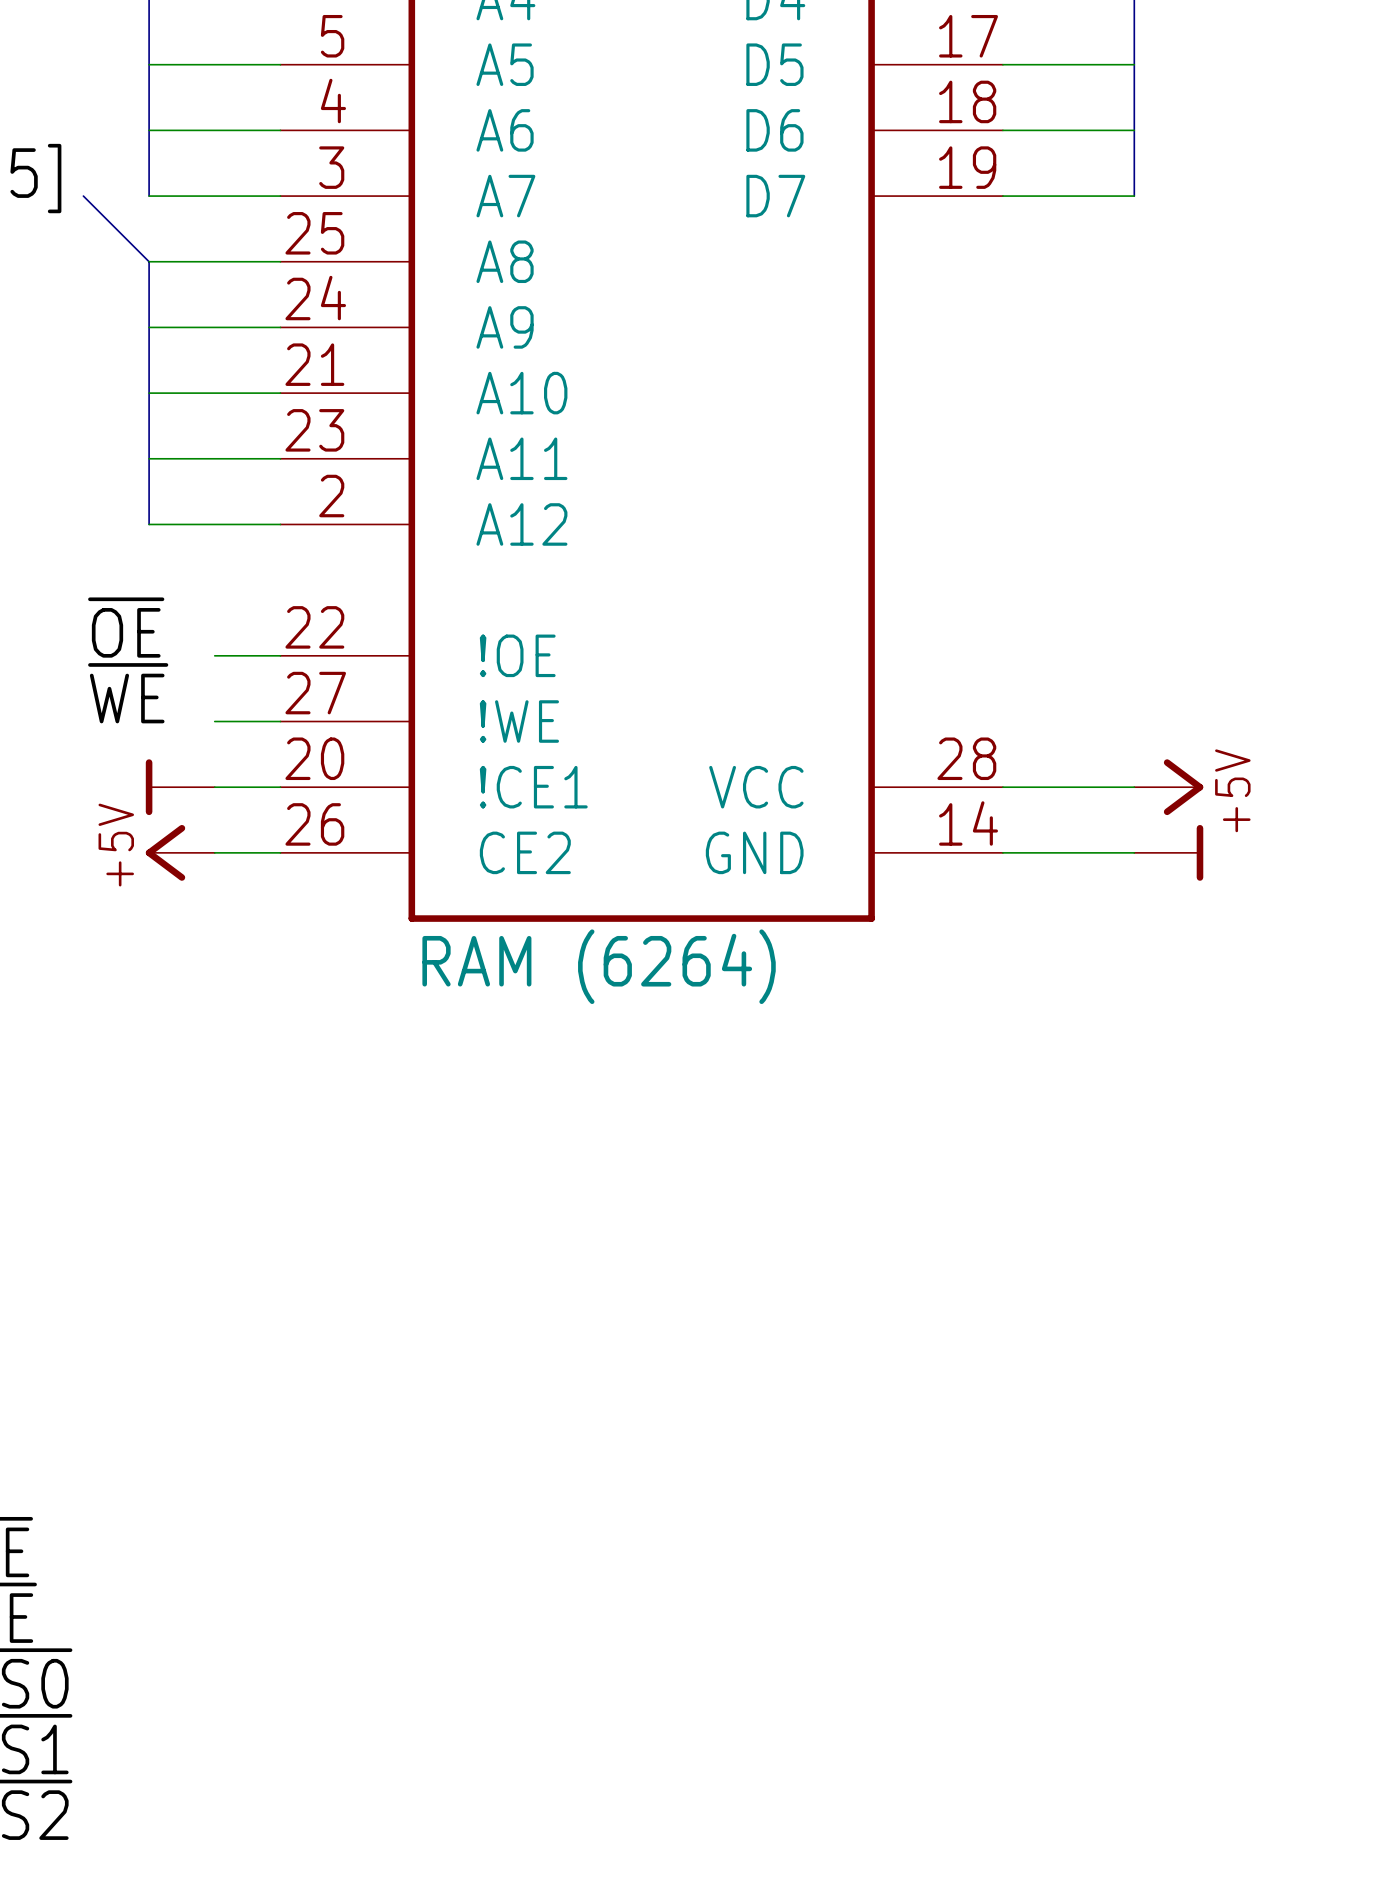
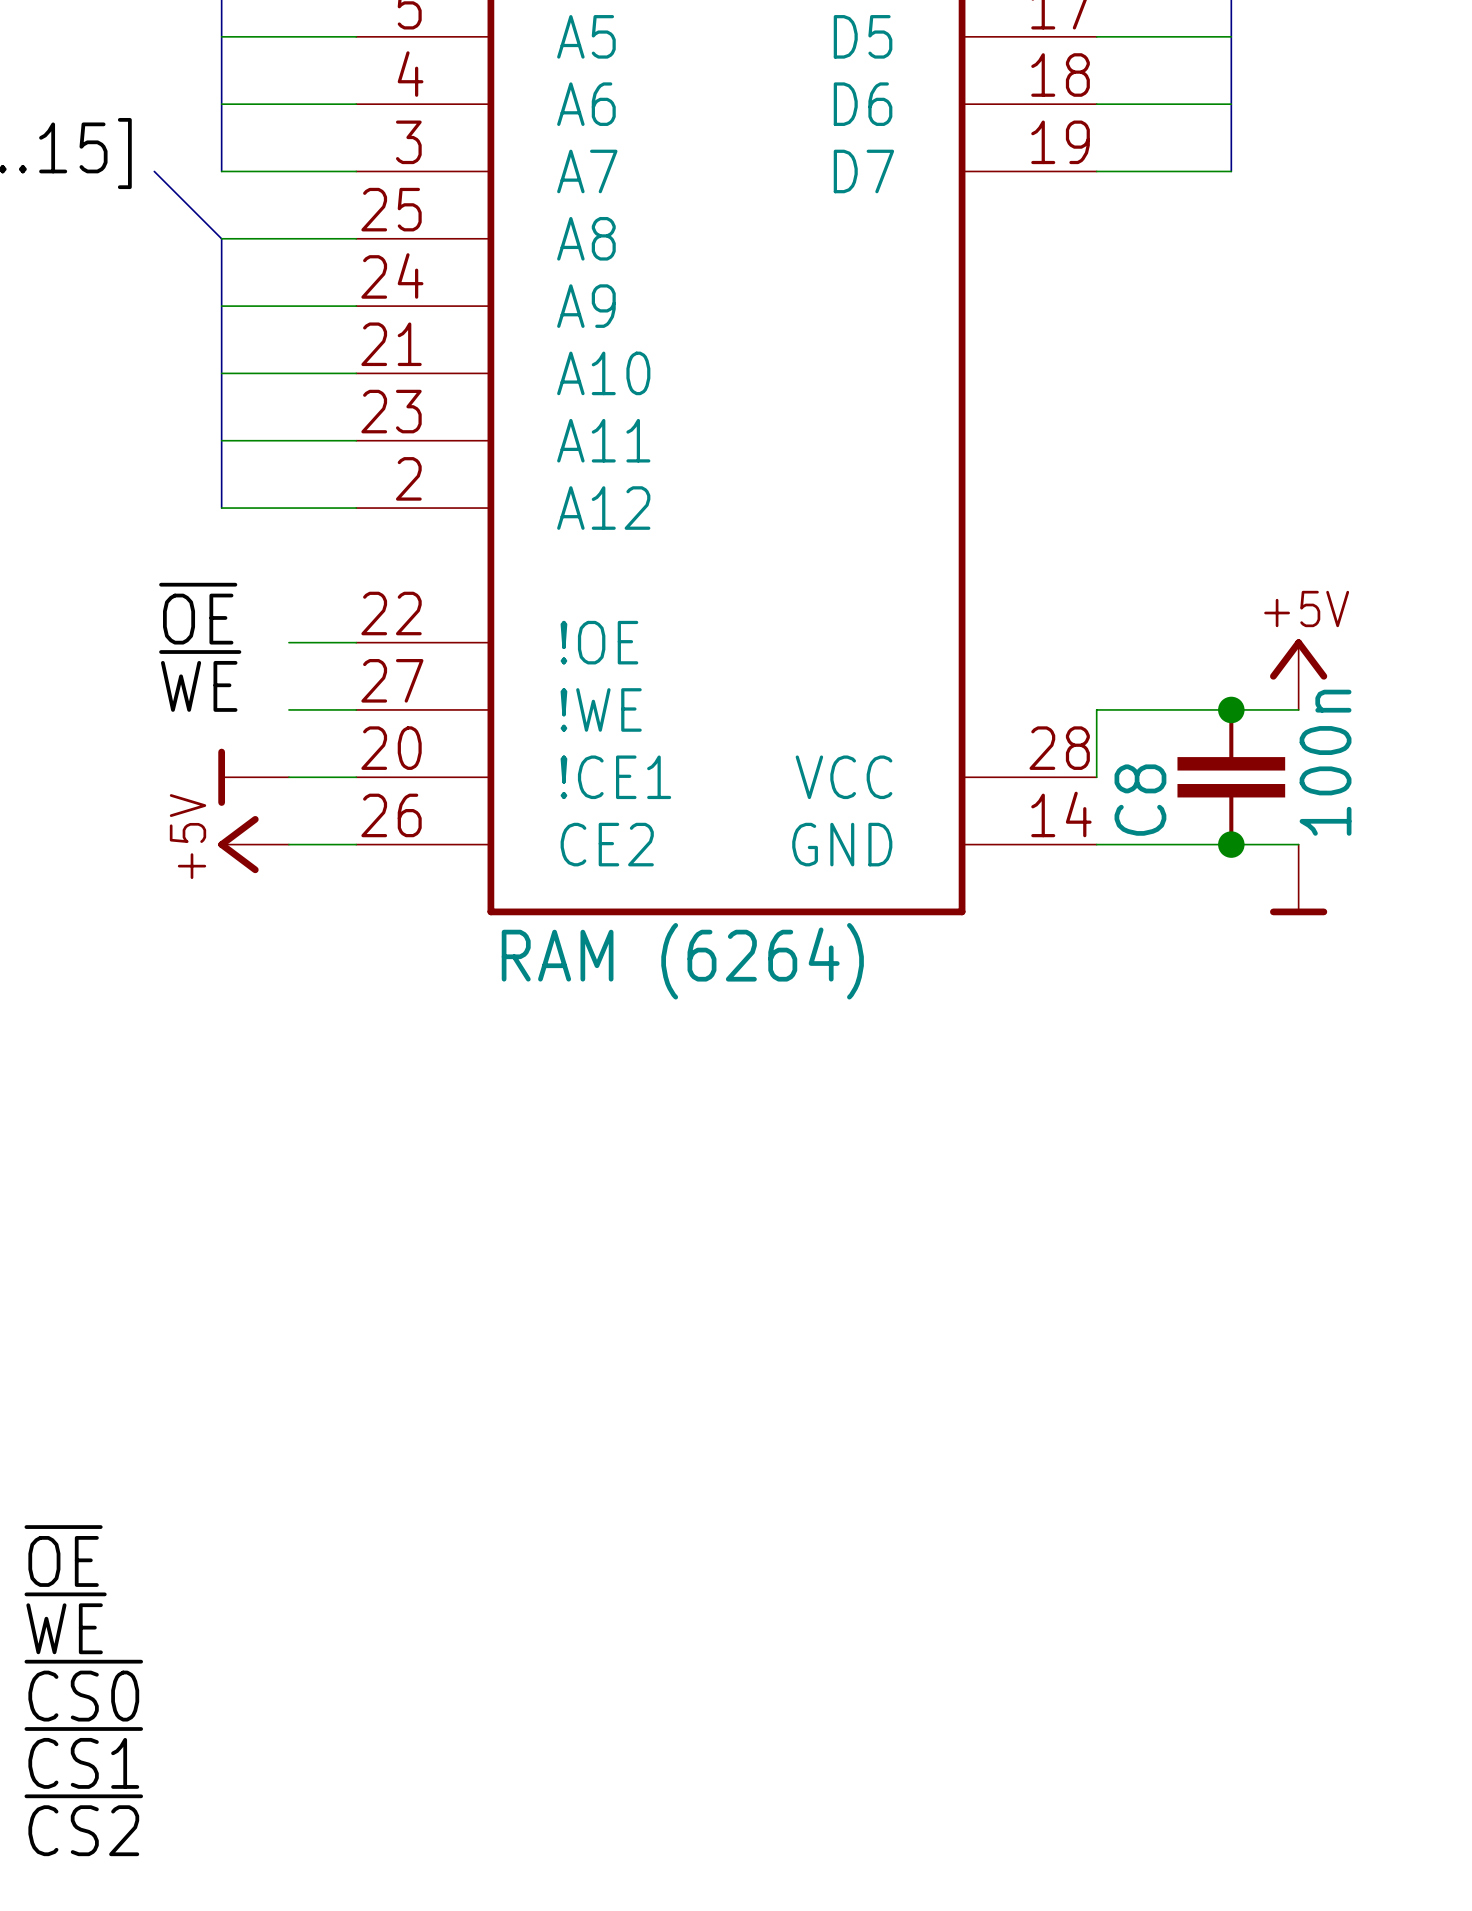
power symbol: none -> (1298, 674)
junction: none -> (1231, 709)
wire: (1002, 787) (1134, 787) -> (1096, 777) (1096, 709) (1298, 709)
C8: none -> 100n (1231, 777)
power symbol: (1168, 787) -> none
junction: none -> (1231, 844)
power symbol position: (1168, 852) -> (1298, 879)
power symbol rotation: 0° (1199, 852) -> 90° clockwise (1298, 911)

